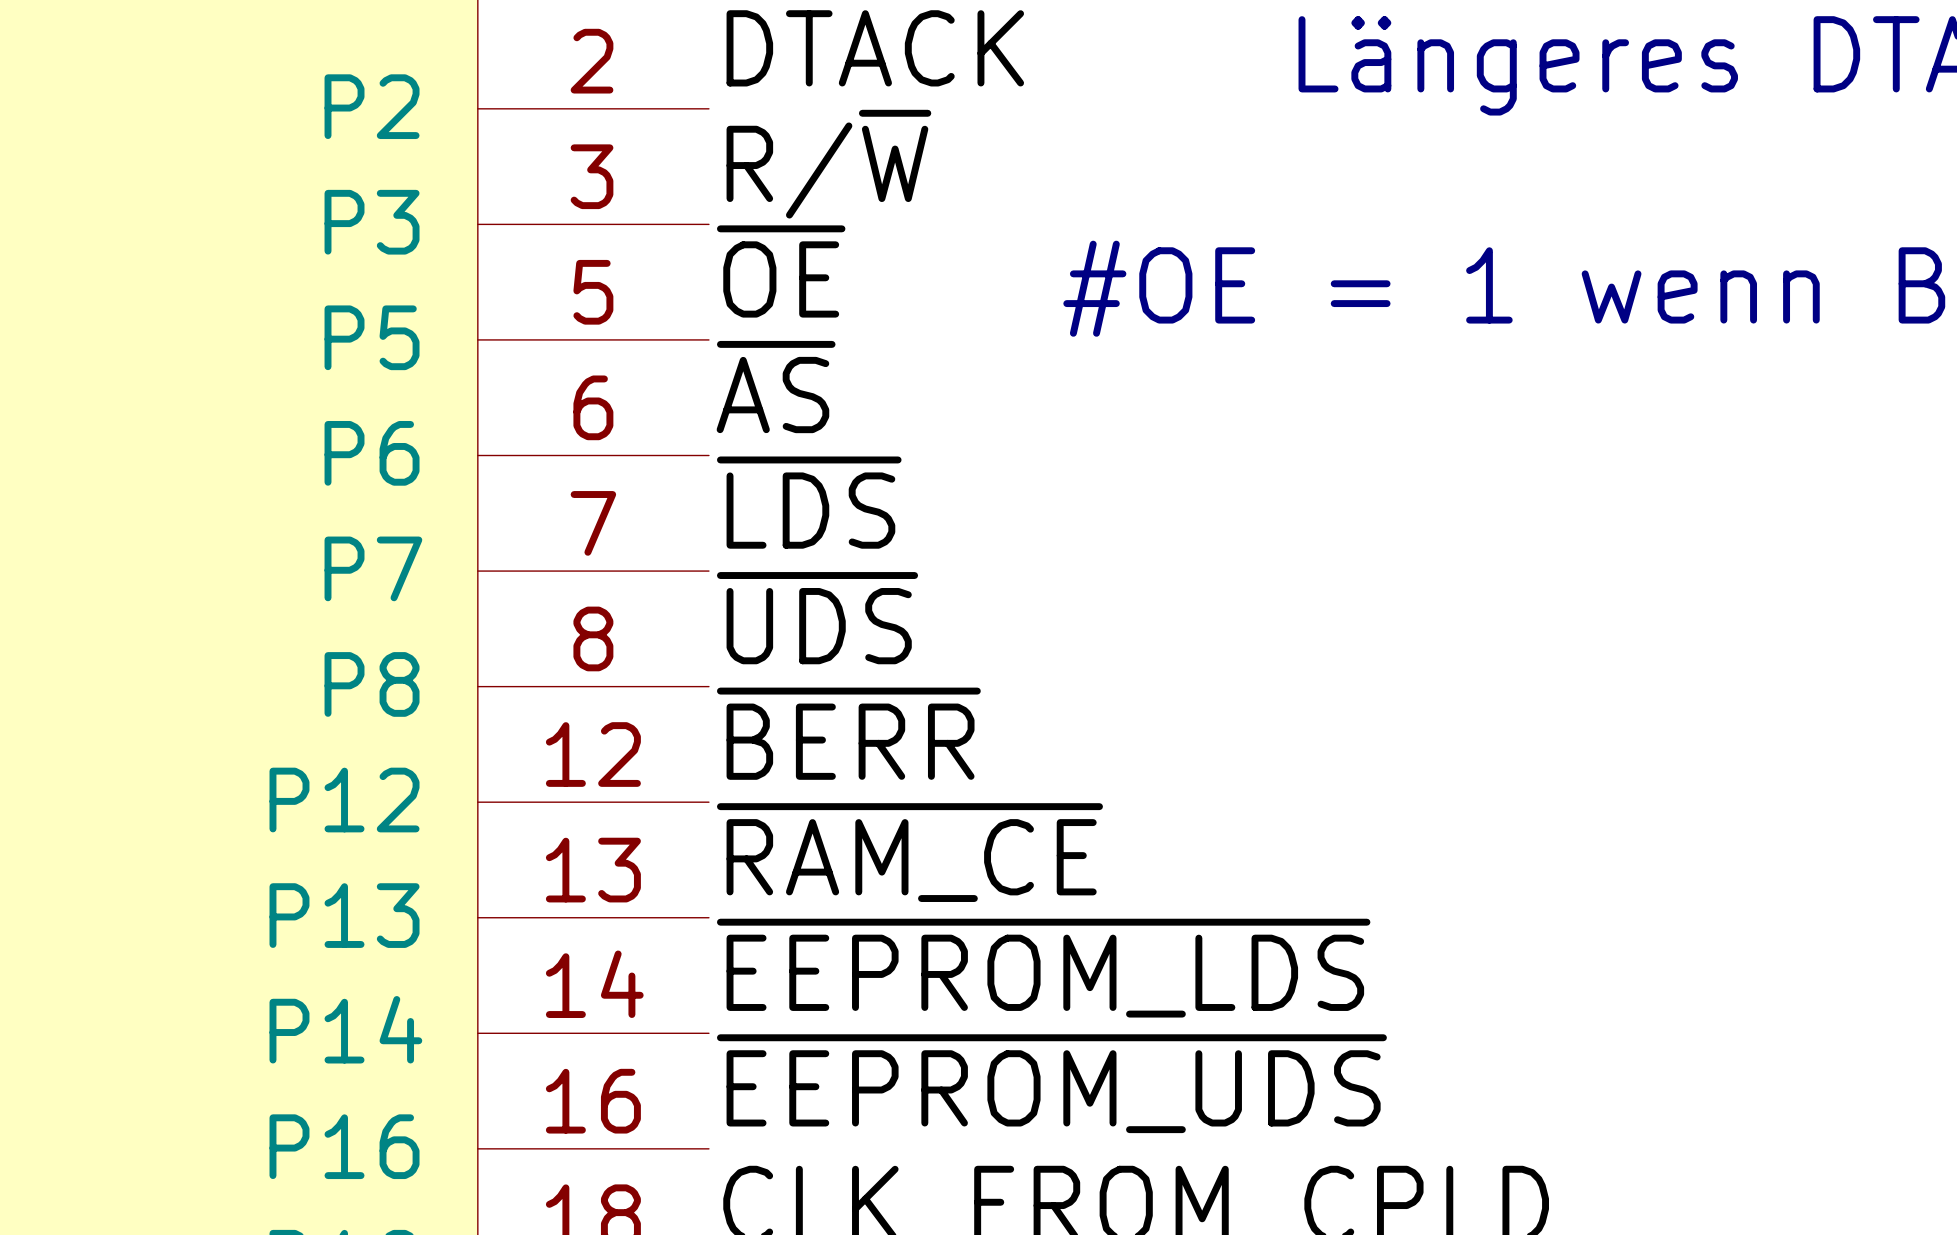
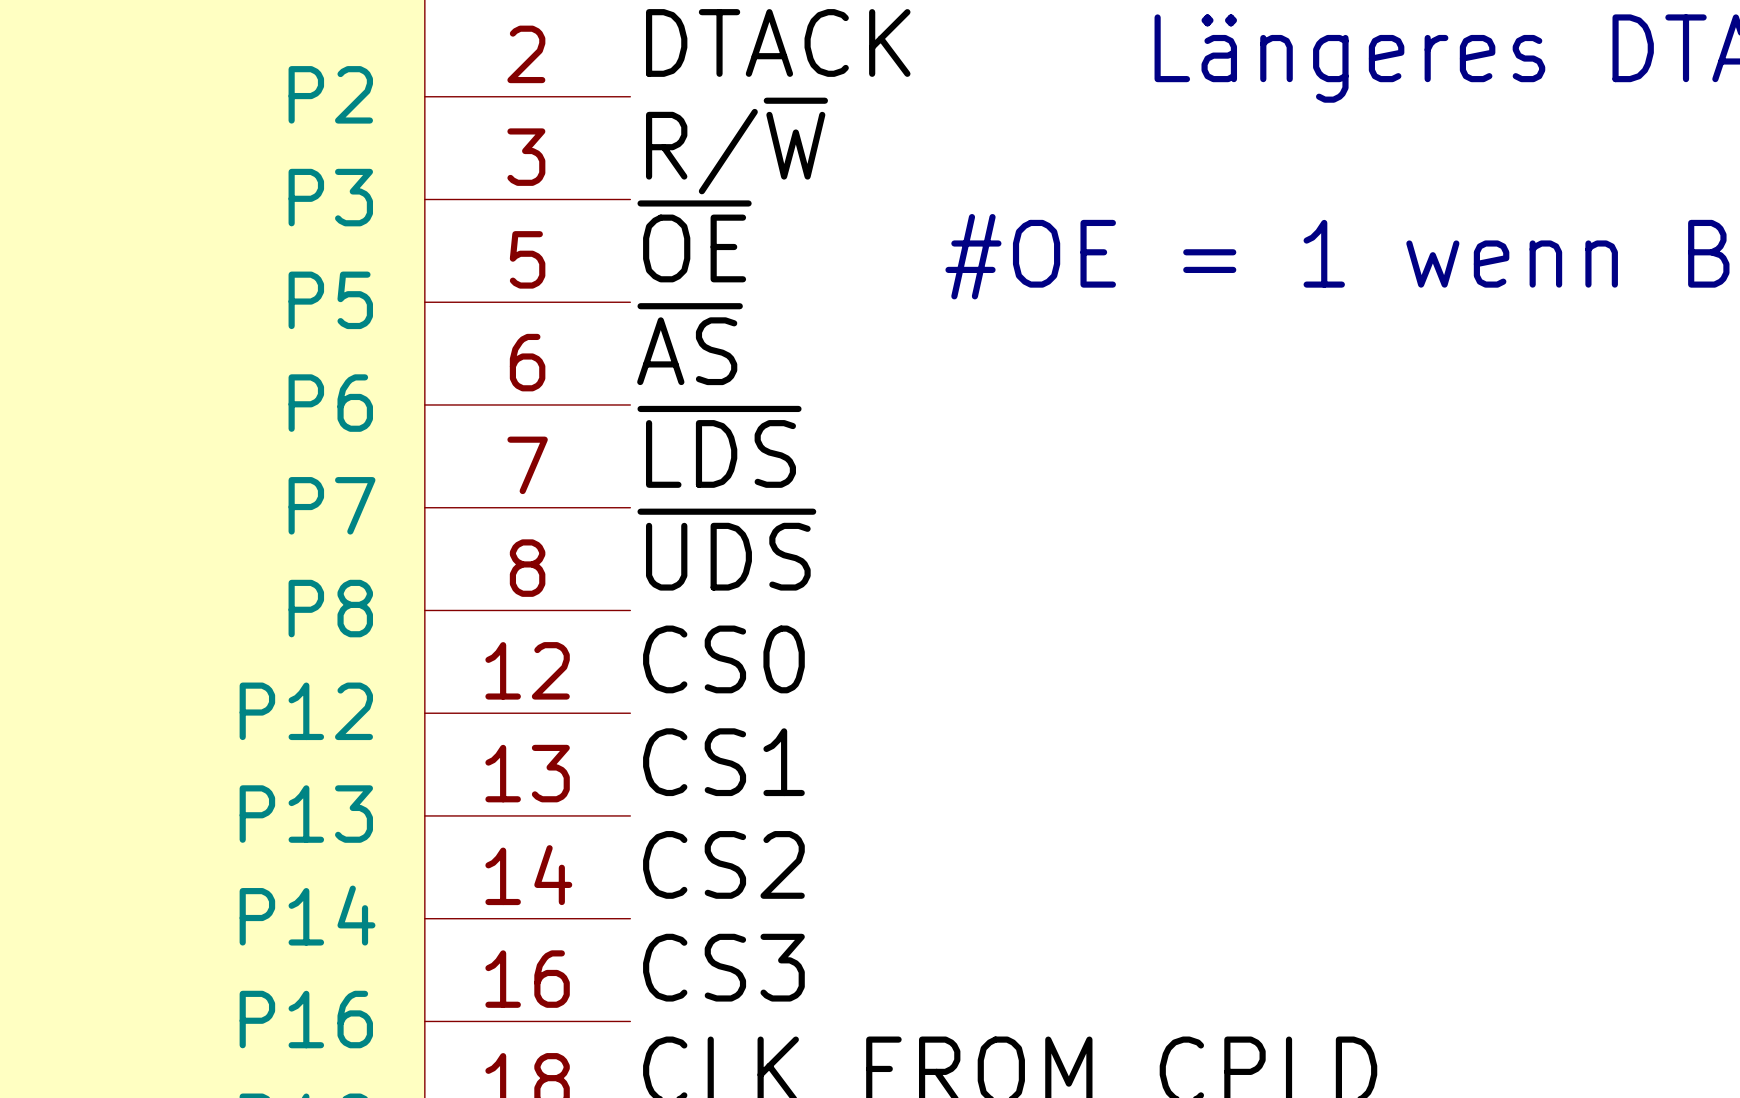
label: ~{BERR} (848, 733) -> CS0 (723, 659)
label: ~{RAM_CE} (909, 852) -> CS1 (723, 762)
label: ~{EEPROM_LDS} (1043, 968) -> CS2 (723, 864)
label: ~{EEPROM_UDS} (1051, 1083) -> CS3 (723, 967)

